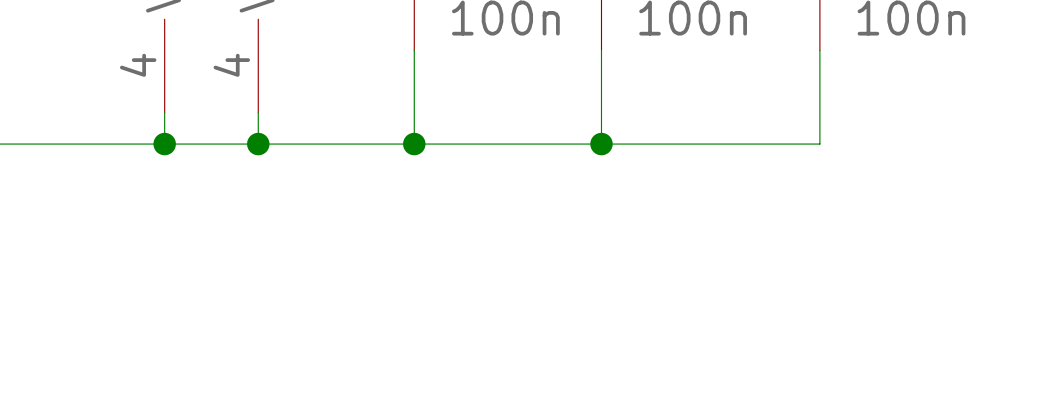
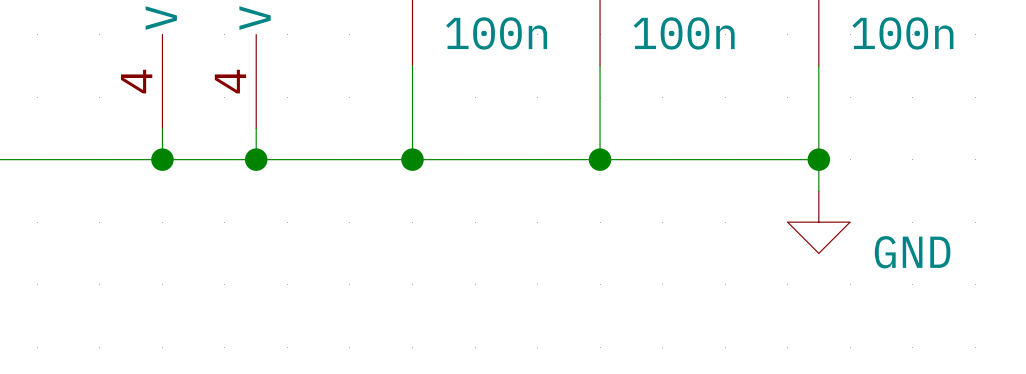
wire: none -> (818, 159) (818, 190)
junction: none -> (818, 159)
power symbol: none -> GND (818, 222)

